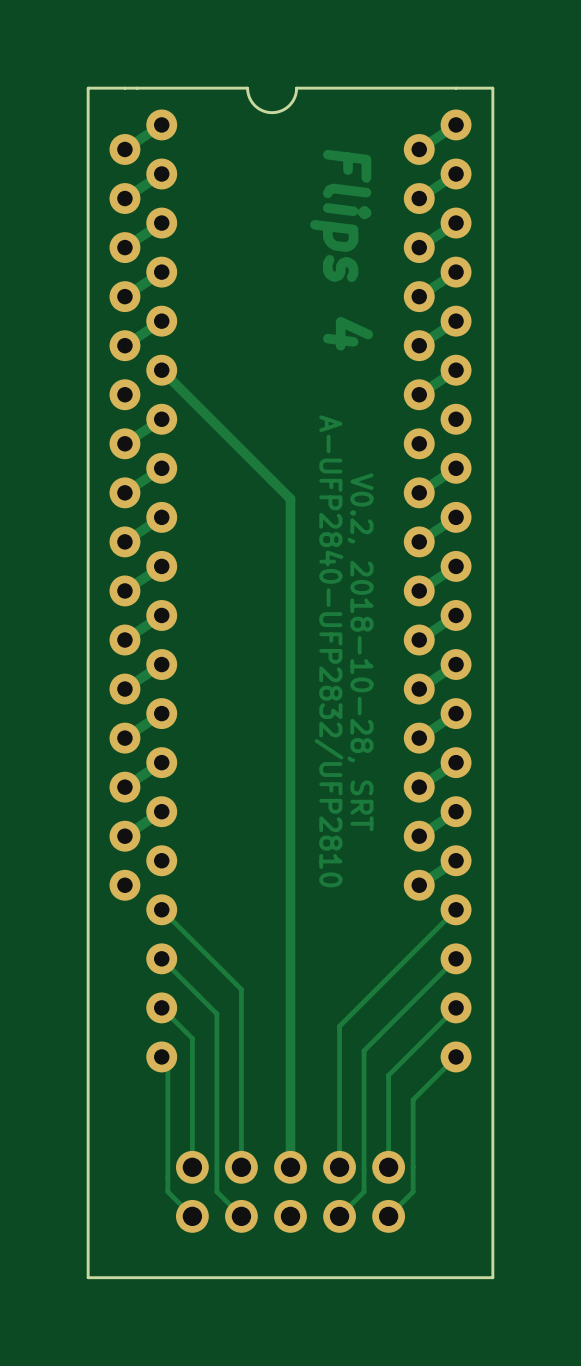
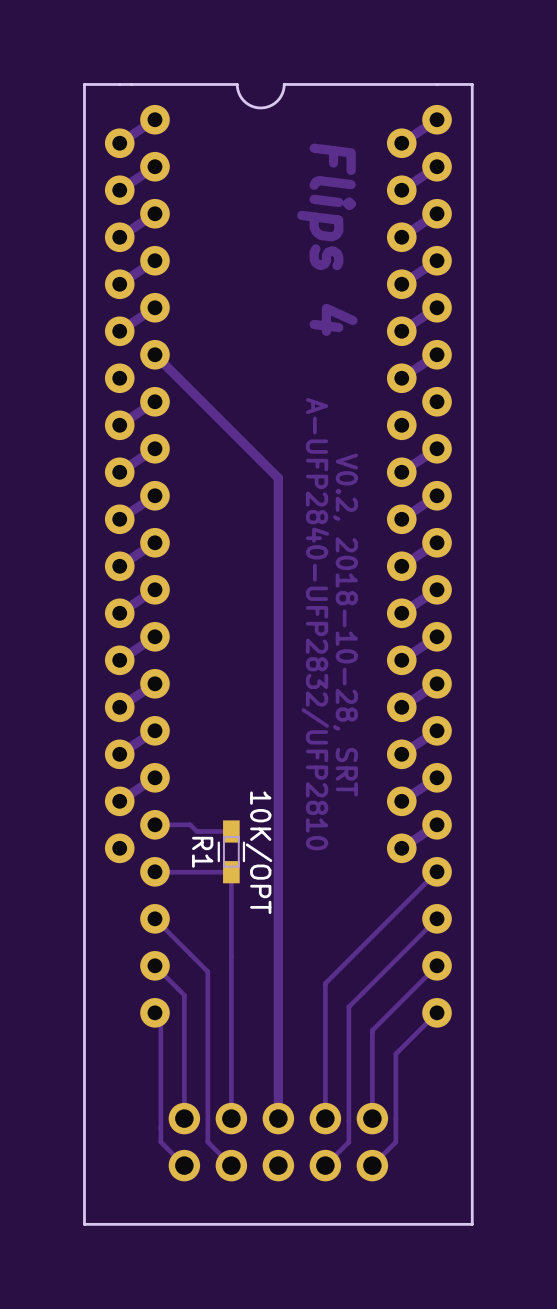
track: none -> (154, 824) (190, 824) (196, 831) (231, 831)
R1: none -> 10K/OPT (231, 851)
track: (162, 910) (241, 989) -> (155, 872) (231, 872) (231, 948)

